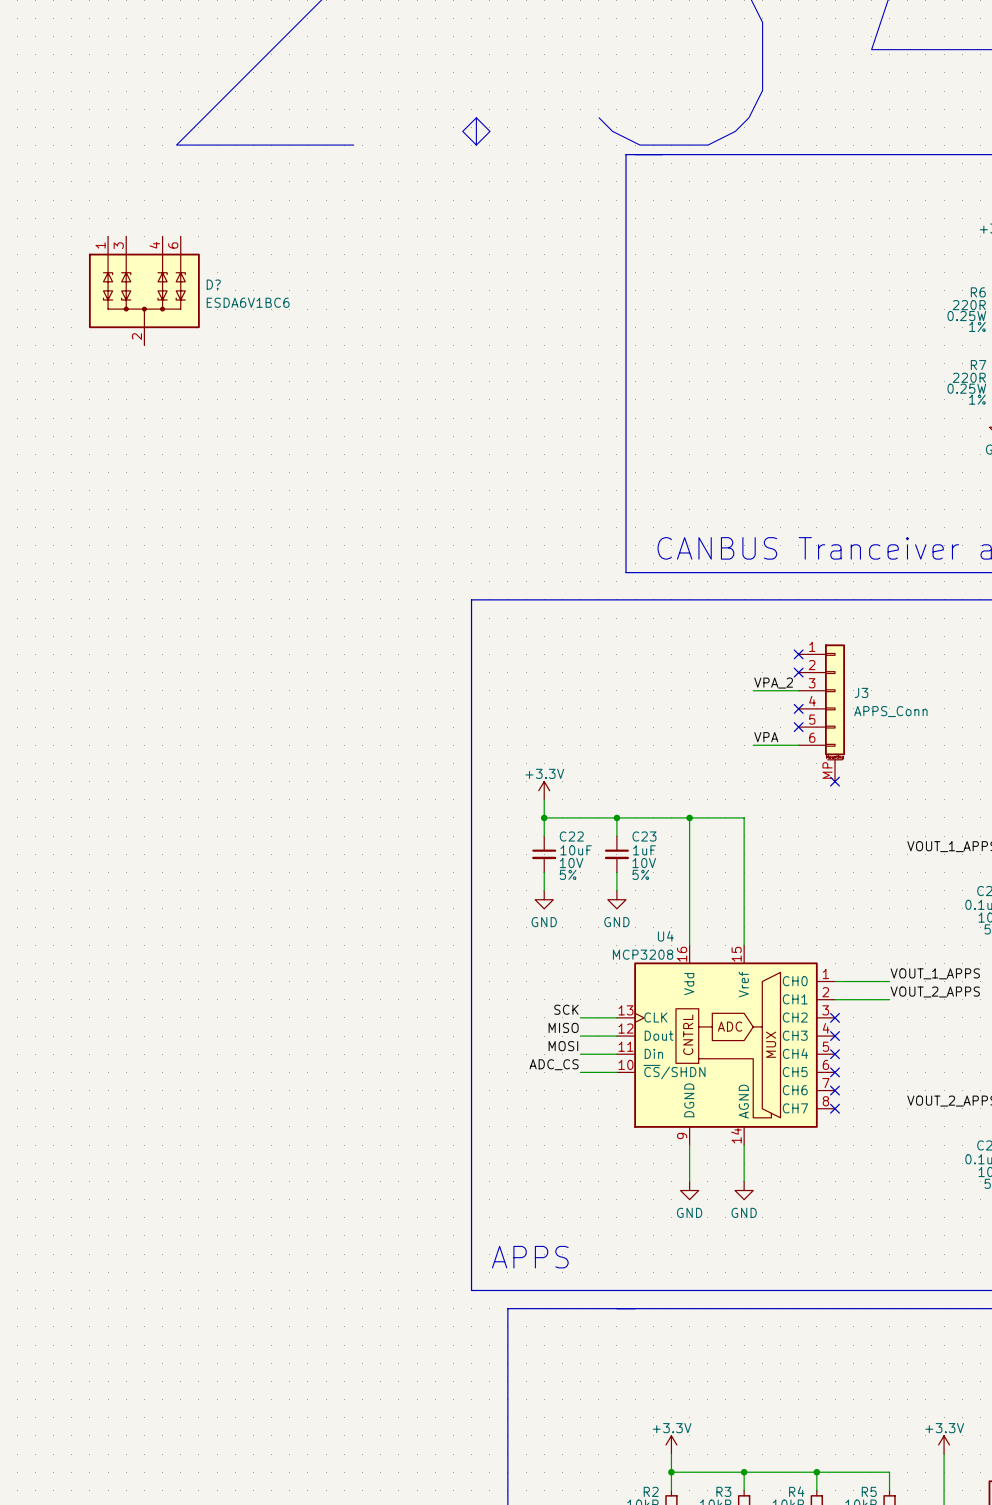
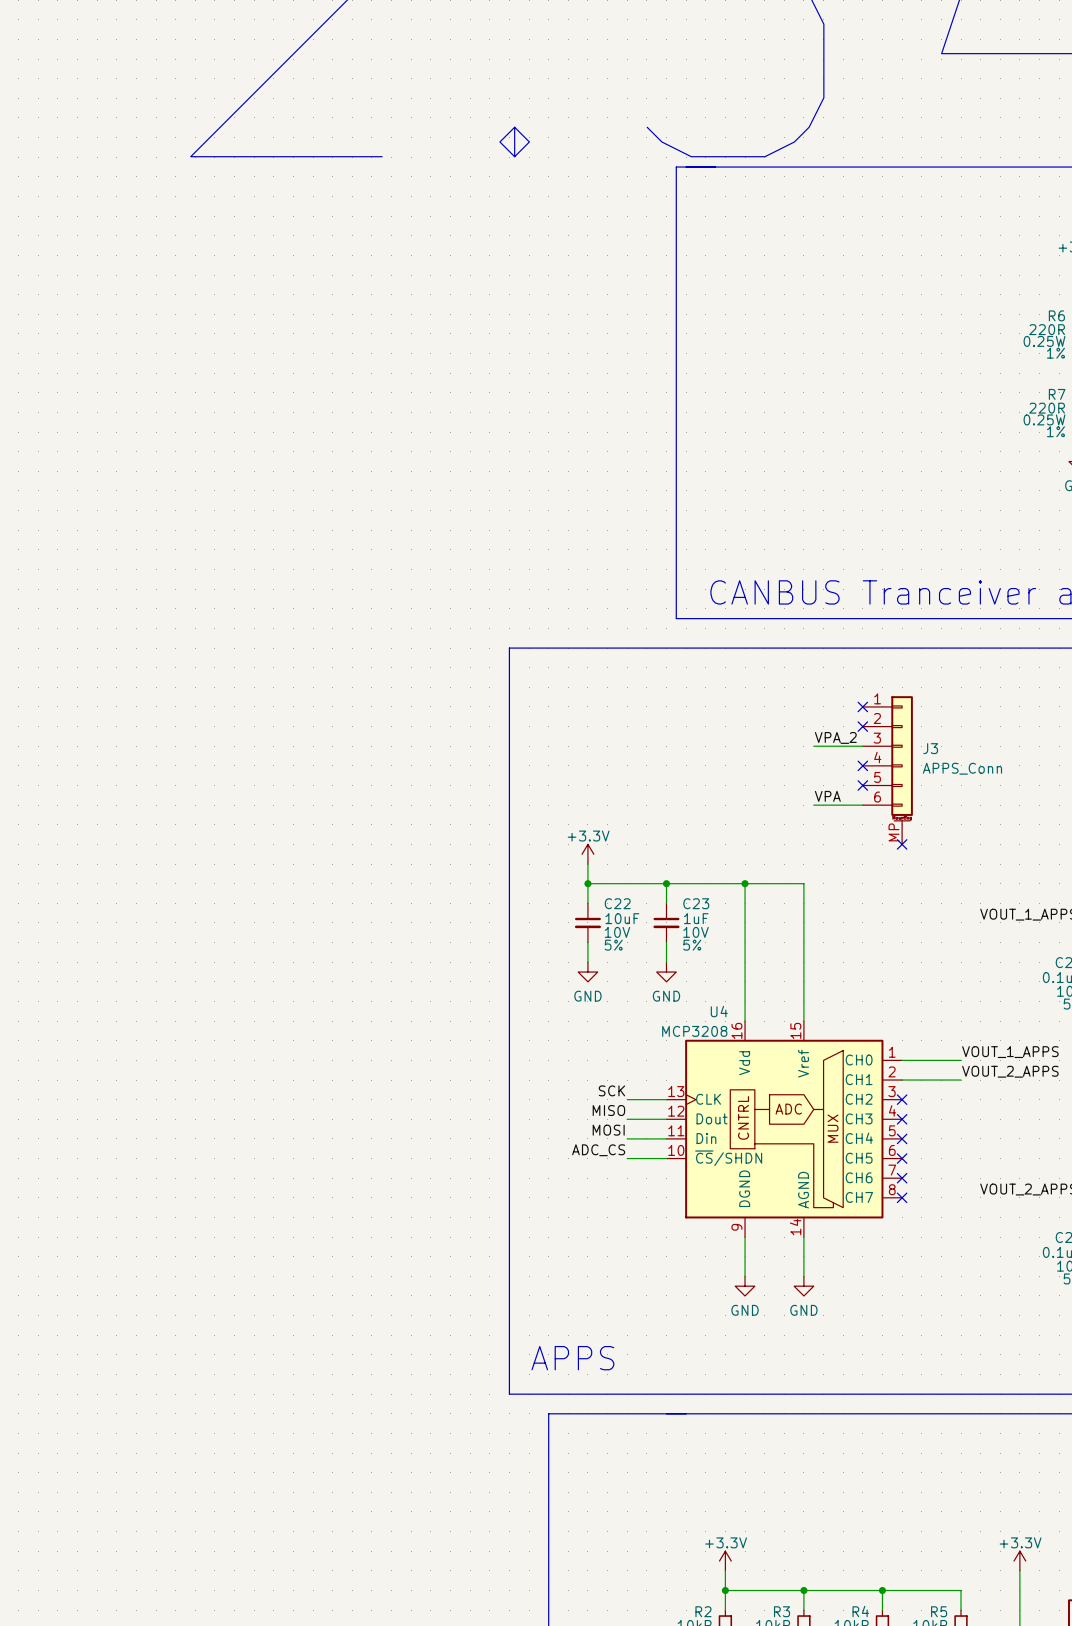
D?: ESDA6V1BC6 (144, 290) -> none

